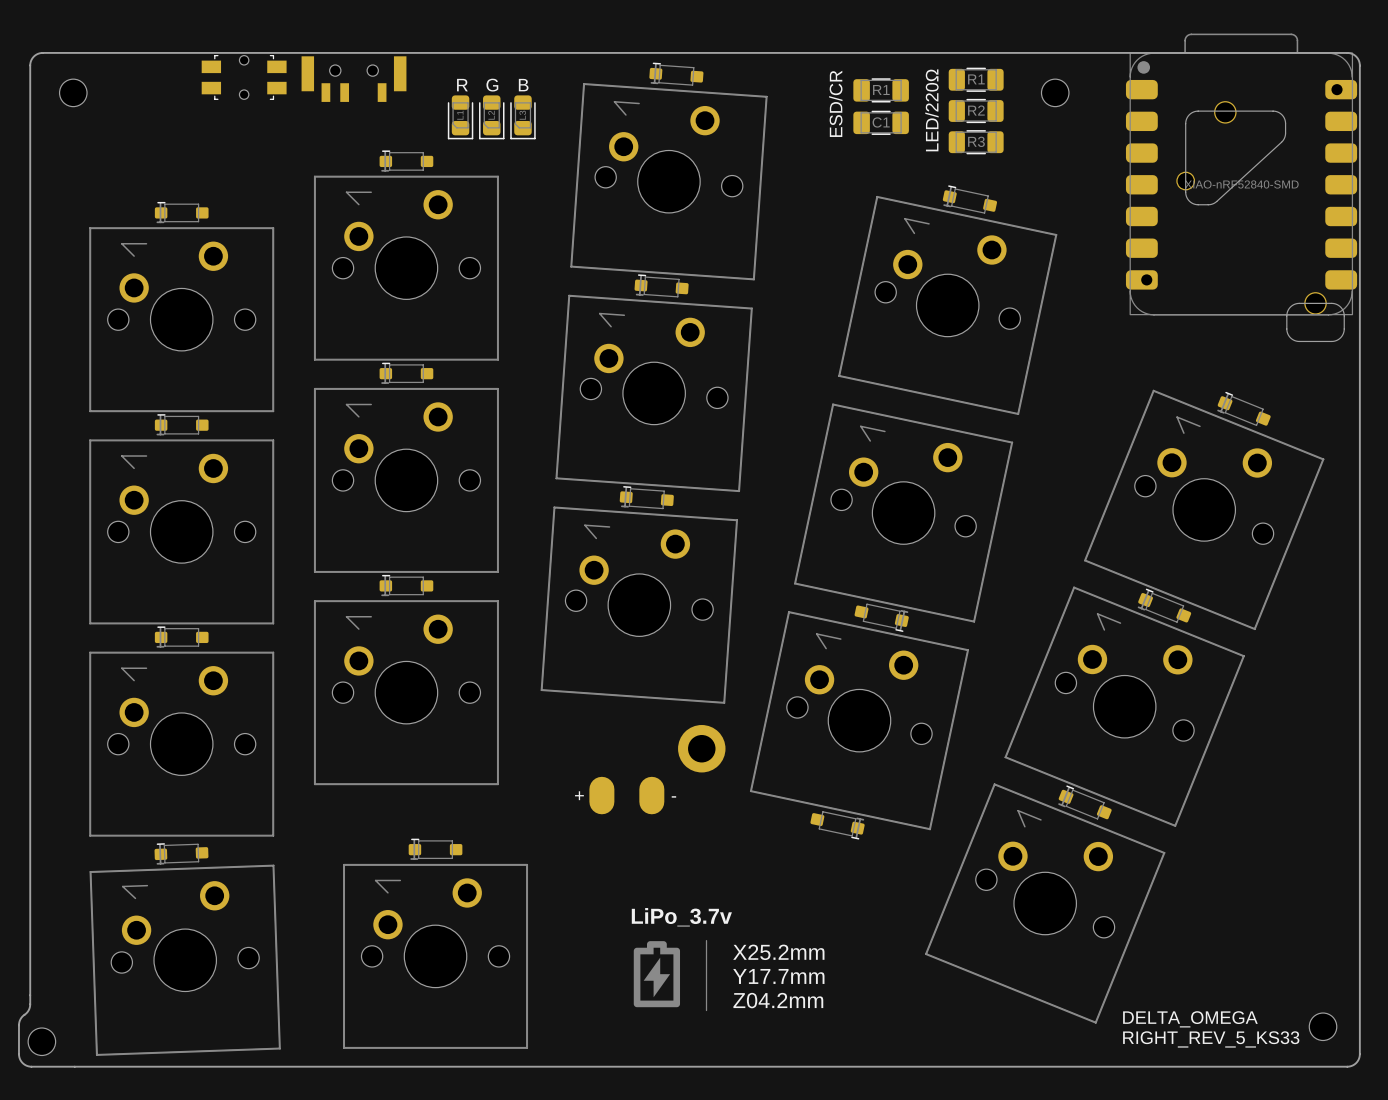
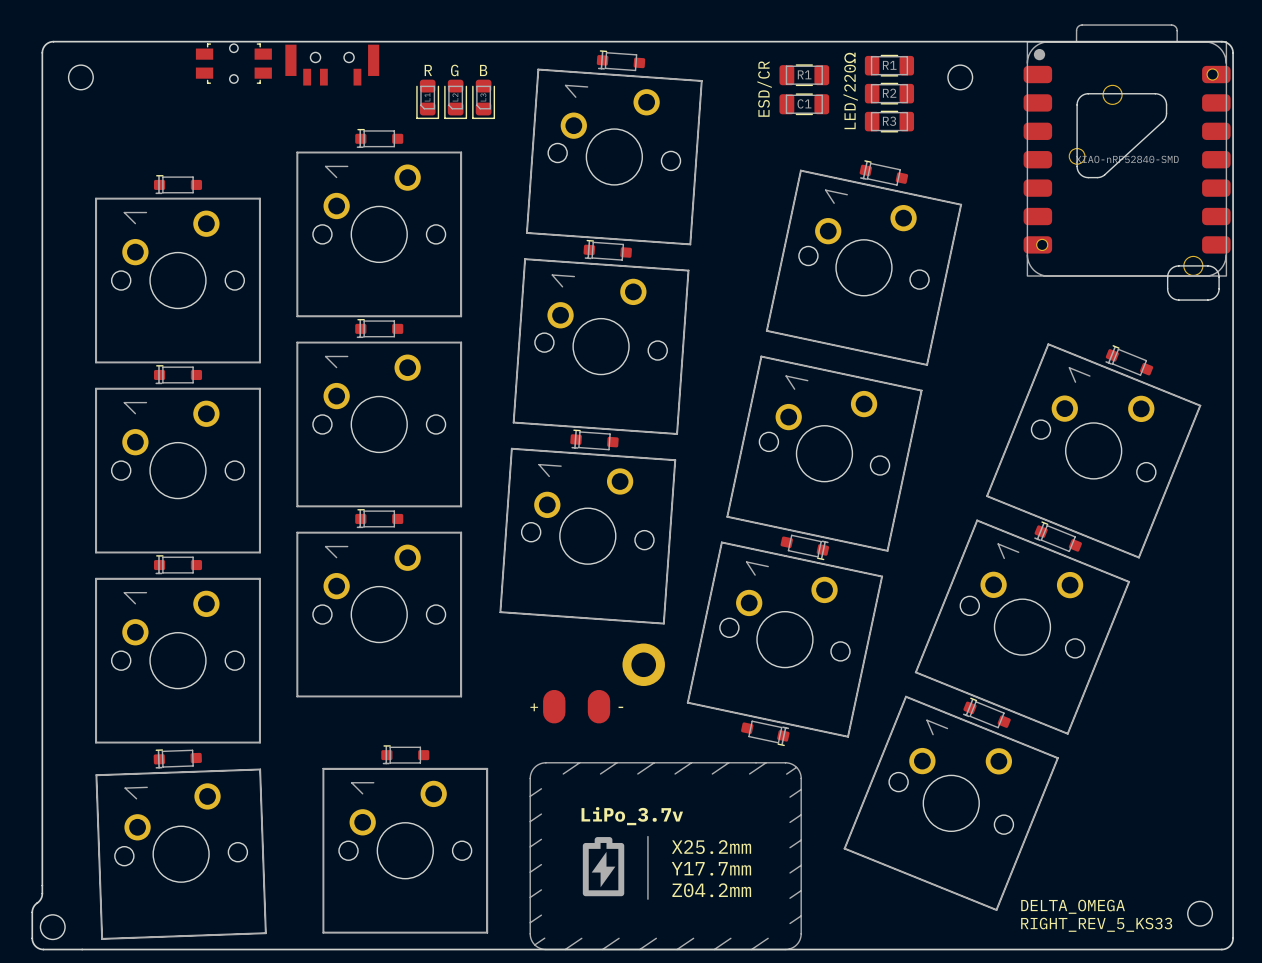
line: none -> (545, 762) (785, 762) (795, 766) (799, 771) (801, 778) (801, 933) (797, 943) (791, 948) (785, 949) (545, 949) (536, 946) (532, 941) (530, 933) (530, 778) (534, 767) (545, 762)
line: none -> (579, 762) (563, 773)
line: none -> (617, 762) (600, 773)
line: none -> (654, 762) (637, 773)
line: none -> (691, 762) (675, 773)
line: none -> (728, 762) (712, 773)
line: none -> (766, 762) (749, 773)
line: none -> (796, 767) (786, 774)
line: none -> (541, 788) (530, 796)
line: none -> (801, 789) (790, 797)
line: none -> (541, 814) (530, 821)
line: none -> (801, 814) (790, 822)
line: none -> (541, 839) (530, 846)
line: none -> (801, 840) (790, 847)
line: none -> (541, 864) (530, 872)
line: none -> (801, 865) (790, 872)
line: none -> (541, 889) (530, 897)
line: none -> (801, 890) (790, 898)
line: none -> (541, 915) (530, 922)
line: none -> (801, 915) (790, 923)
line: none -> (544, 938) (534, 944)
line: none -> (581, 938) (565, 949)
line: none -> (619, 938) (602, 949)
line: none -> (656, 938) (639, 949)
line: none -> (693, 938) (677, 949)
line: none -> (730, 938) (714, 949)
line: none -> (768, 938) (751, 949)

